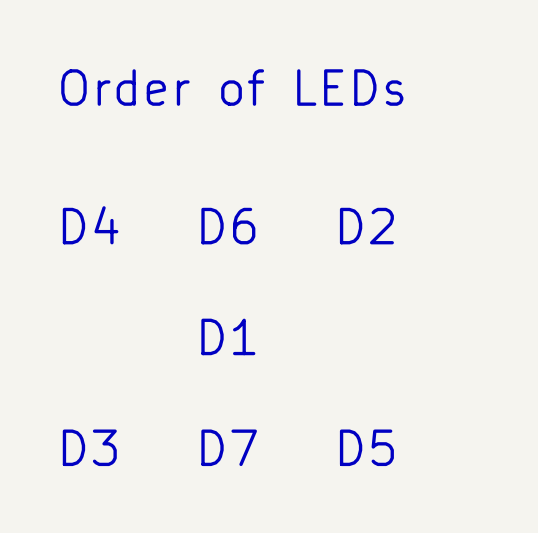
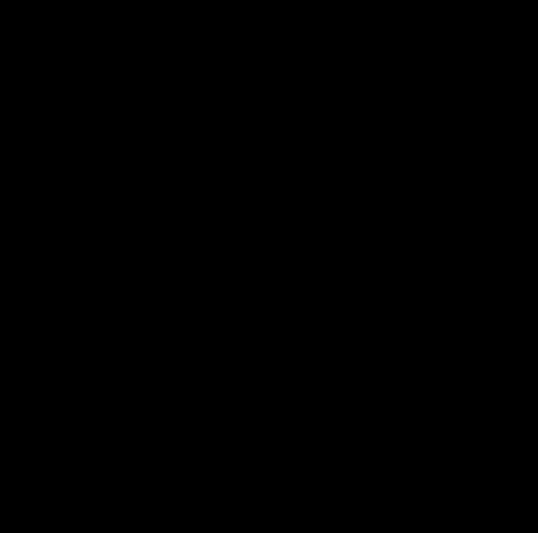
text: Order of LEDs (232, 87) -> none
text: D4 (90, 225) -> none
text: D6 (228, 226) -> none
text: D2 (366, 226) -> none
text: D1 (228, 336) -> none
text: D3 (89, 447) -> none
text: D7 (229, 447) -> none
text: D5 (366, 447) -> none

